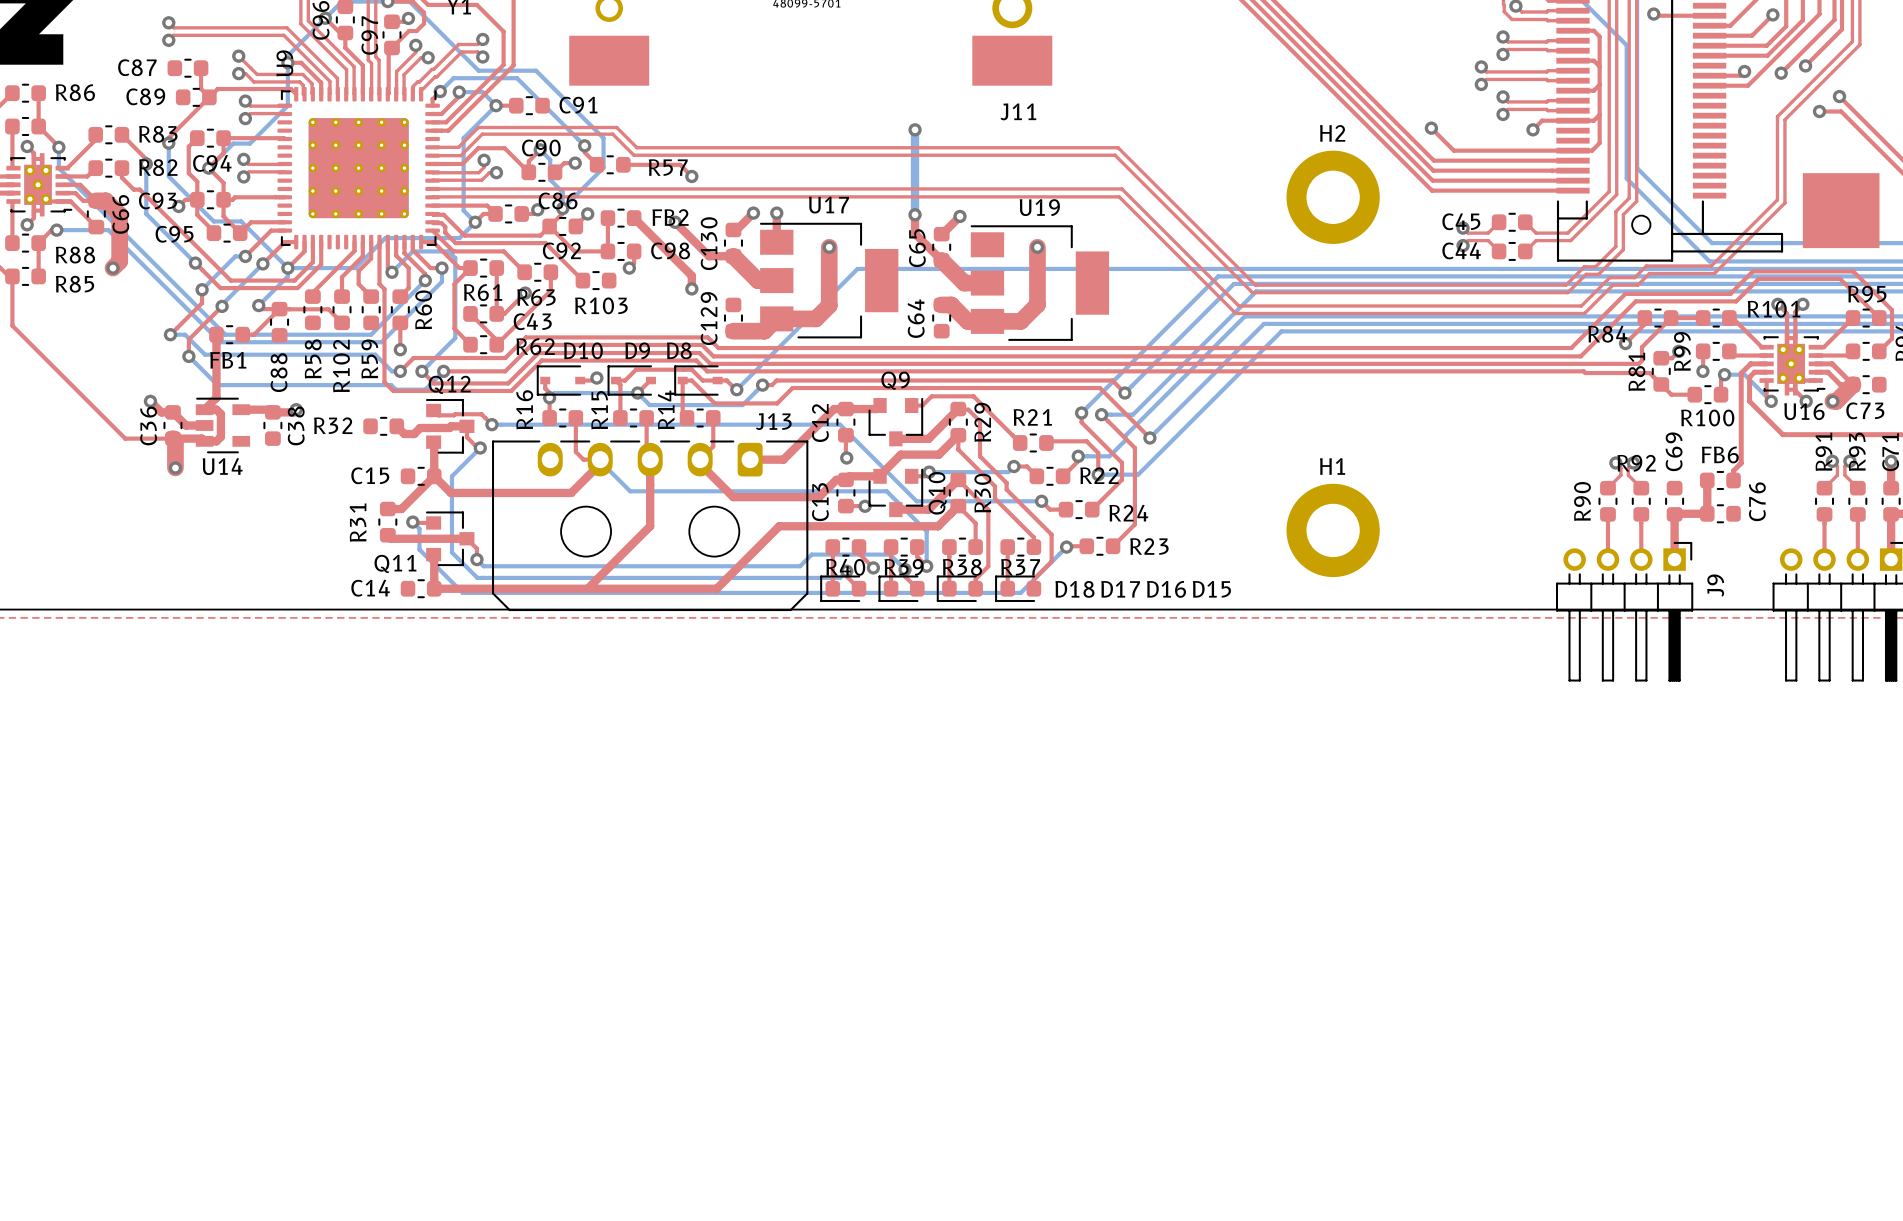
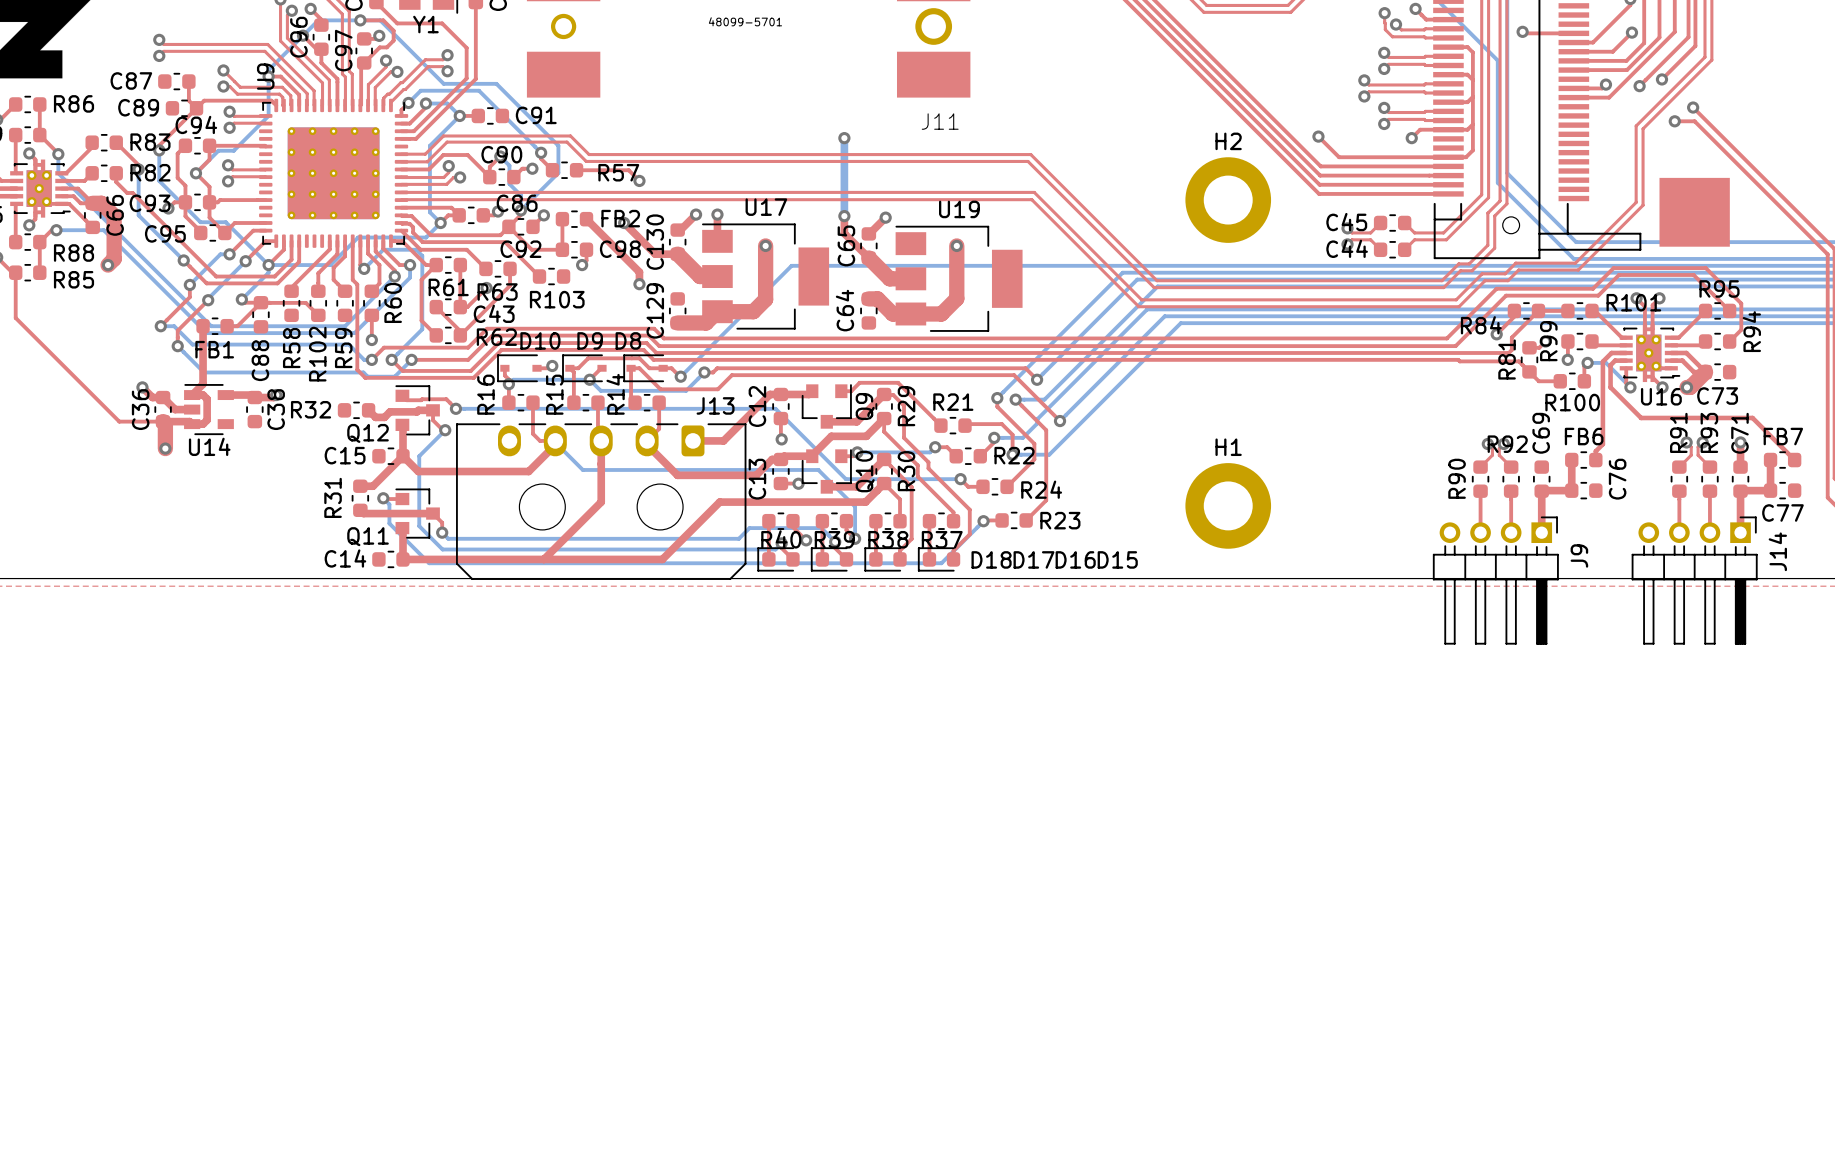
C94 name position: C94 (212, 163) -> C94 (196, 124)
Q9 name rotation: 0° (895, 380) -> 90° counterclockwise (865, 406)
Q9 name position: Q9 (895, 380) -> Q9 (865, 406)
Q12 name position: Q12 (449, 384) -> Q12 (368, 433)

